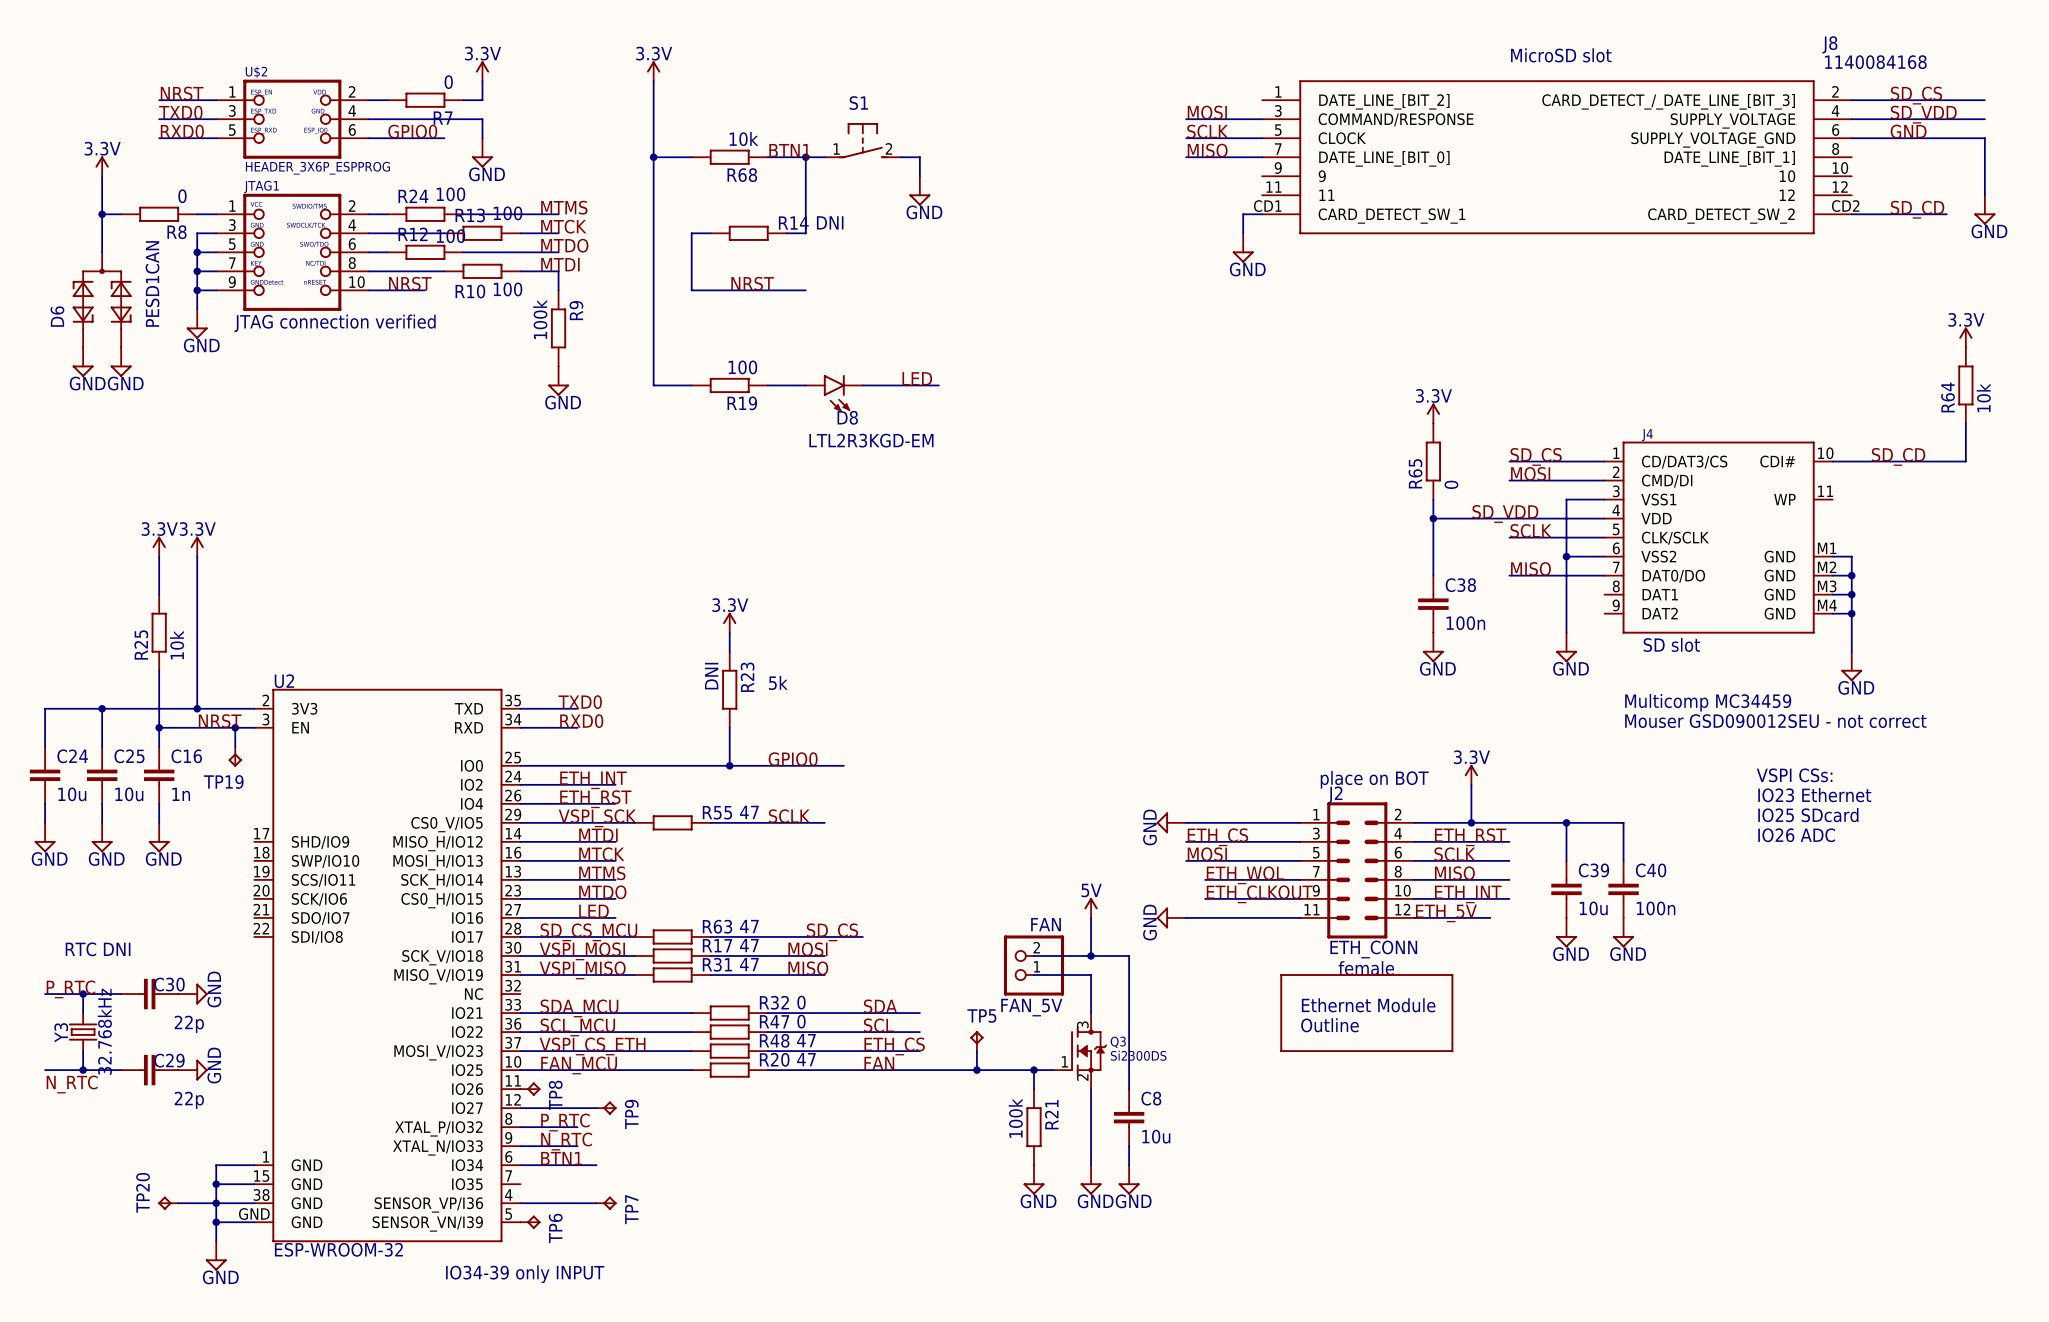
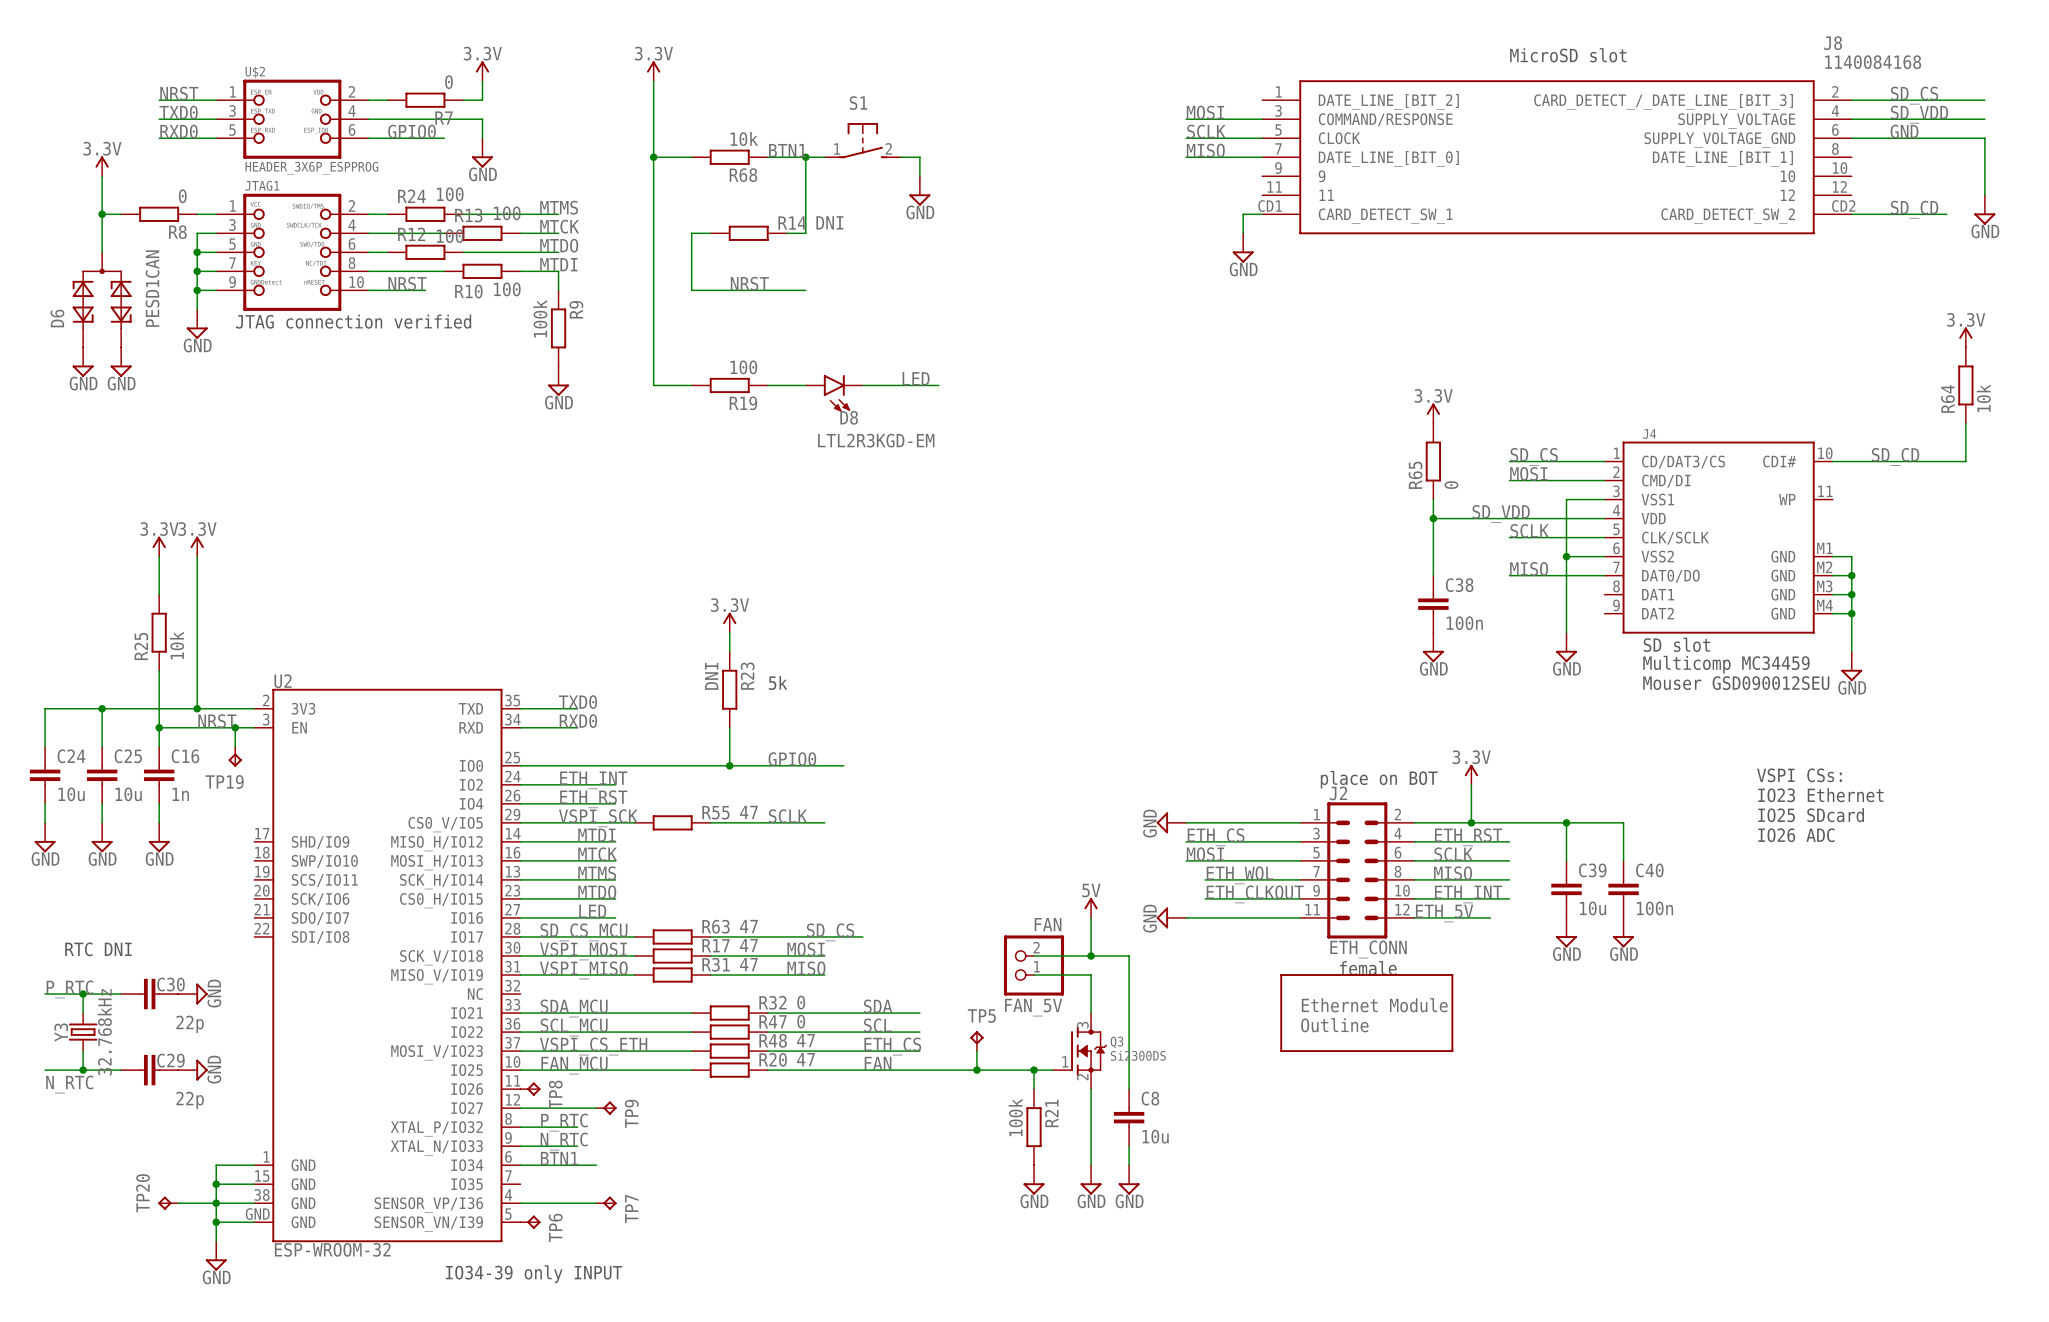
text: none -> Mouser GSD090012SEU (1736, 683)
text position: Multicomp MC34459 (1708, 702) -> Multicomp MC34459 (1726, 664)
text: Mouser GSD090012SEU - not correct (1775, 721) -> none

